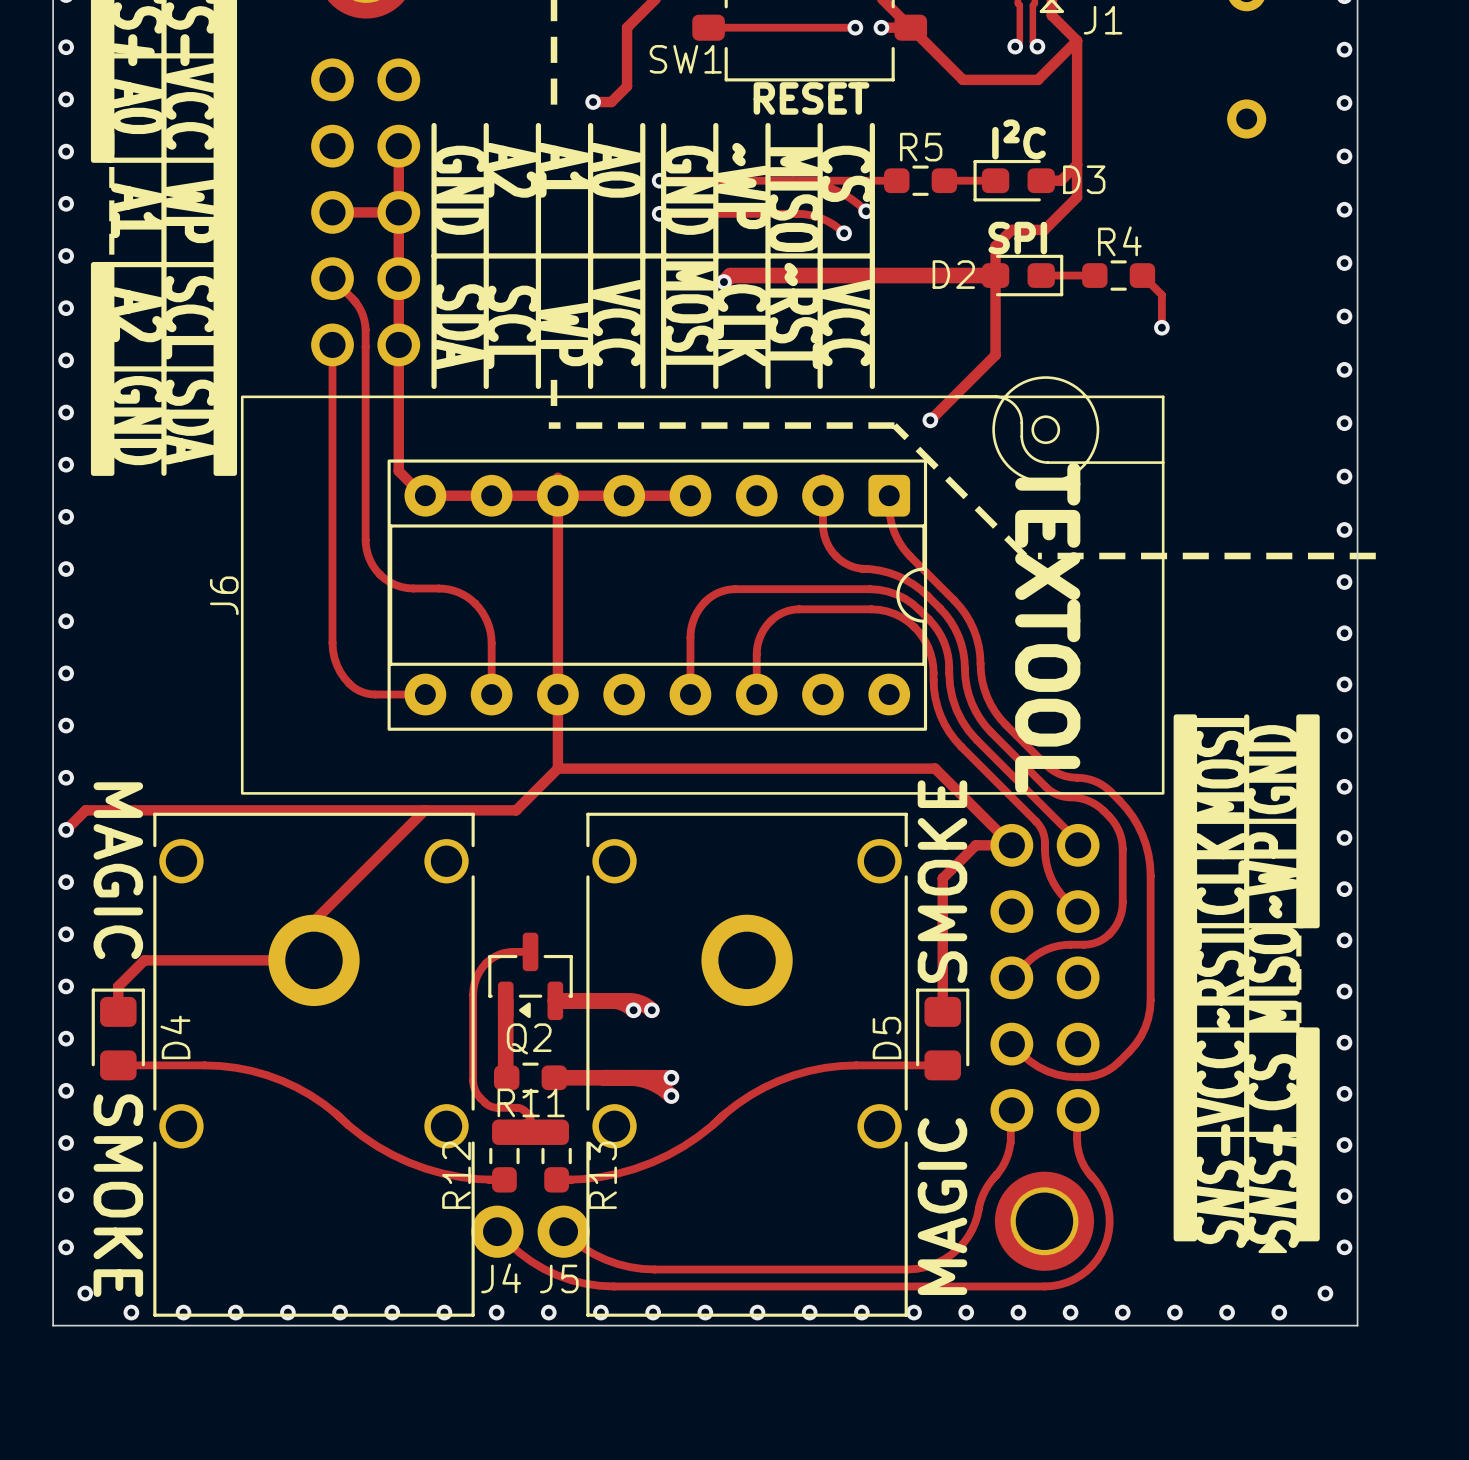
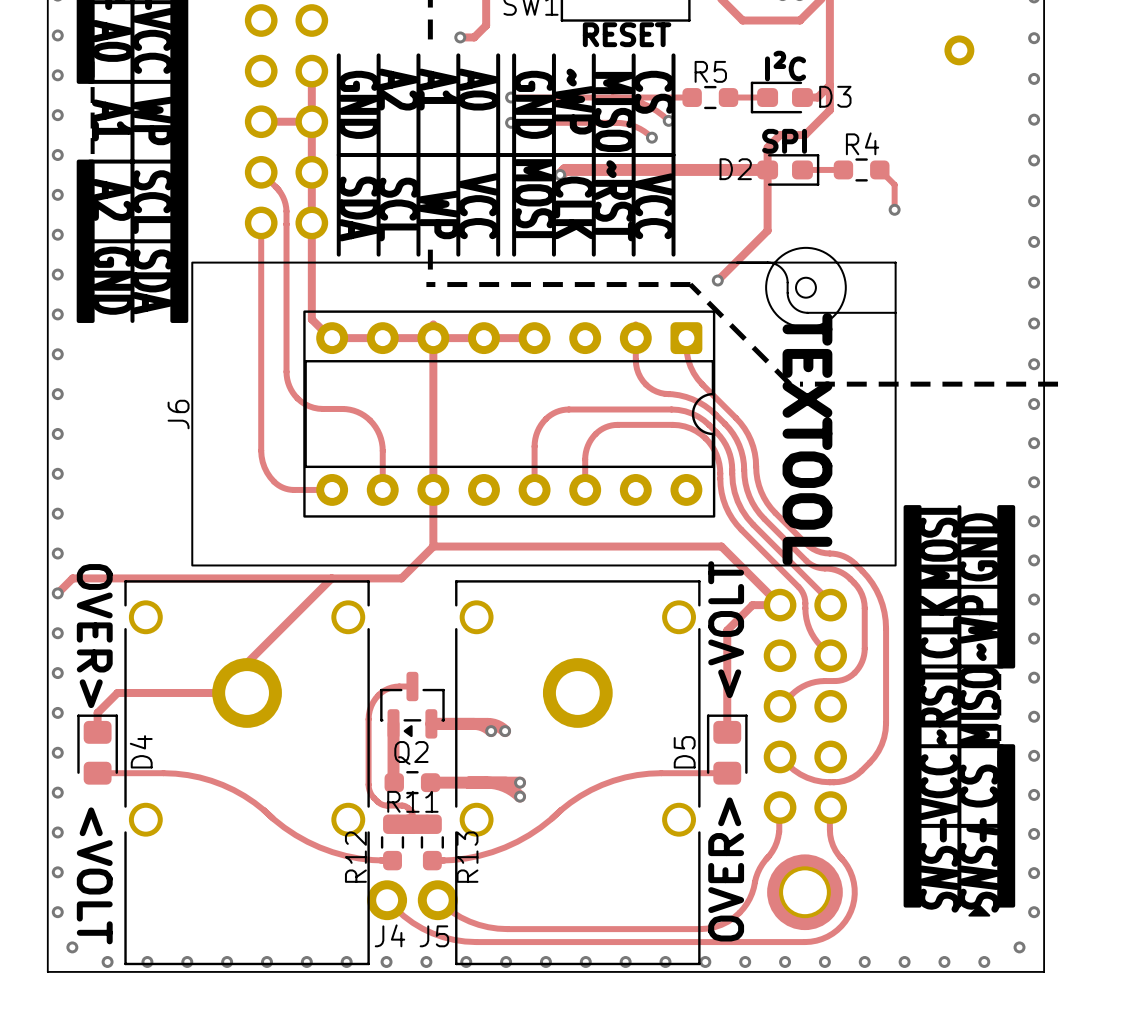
text: MAGIC SMOKE (942, 1037) -> OVER> <VOLT (726, 751)
text: MAGIC SMOKE (118, 1039) -> OVER> <VOLT (94, 754)

